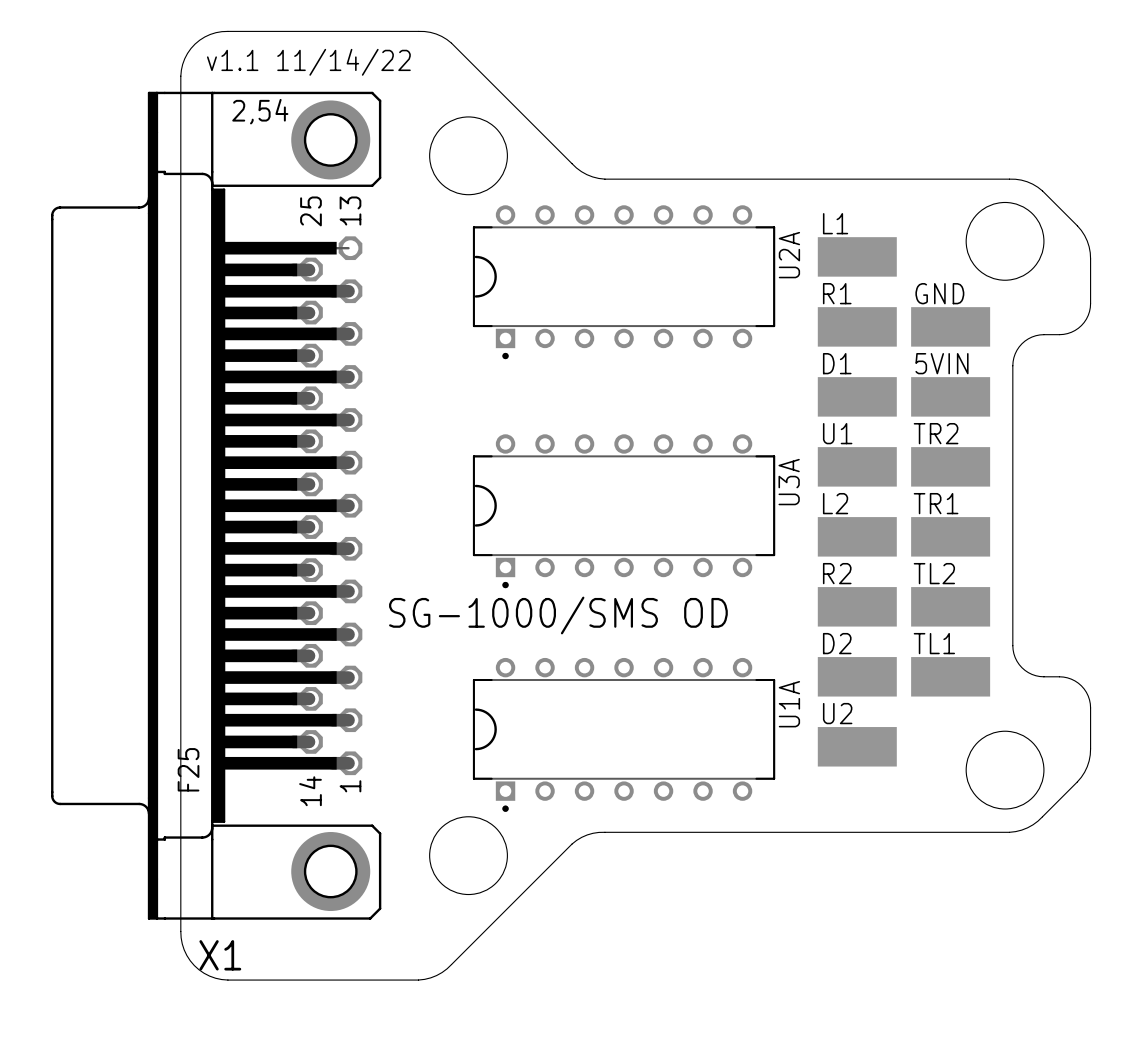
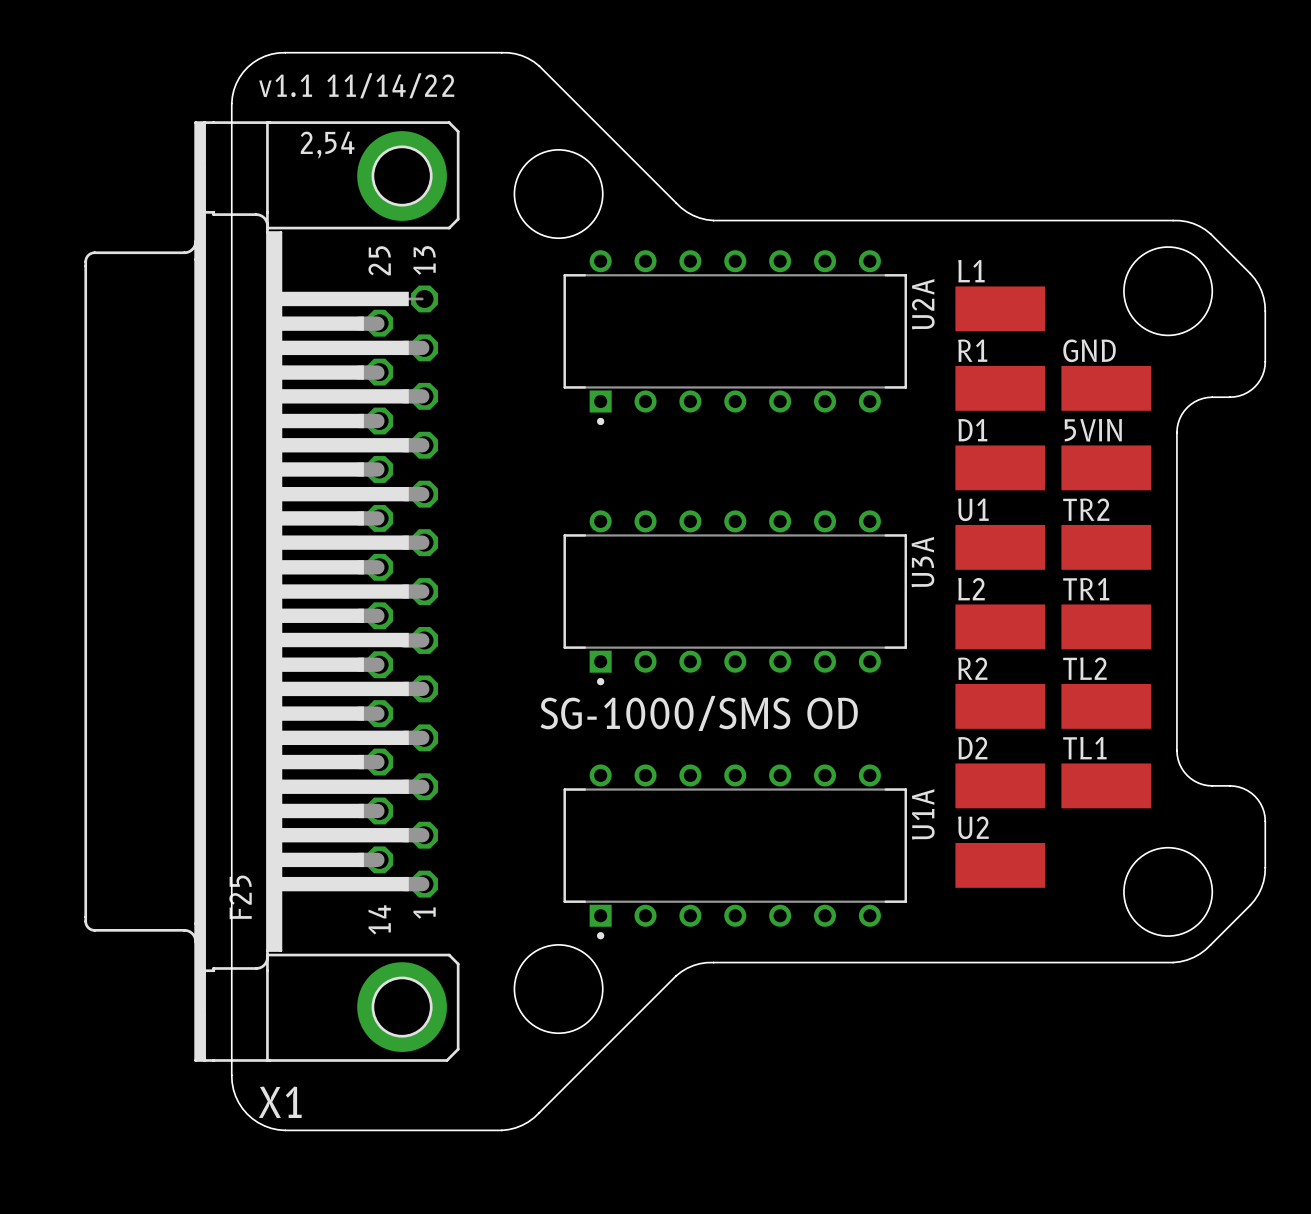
U2A footprint: [472, 205, 776, 360] -> [563, 250, 907, 426]
U3A footprint: [472, 434, 776, 589] -> [563, 510, 907, 686]
U1A footprint: [472, 657, 776, 812] -> [563, 764, 907, 940]

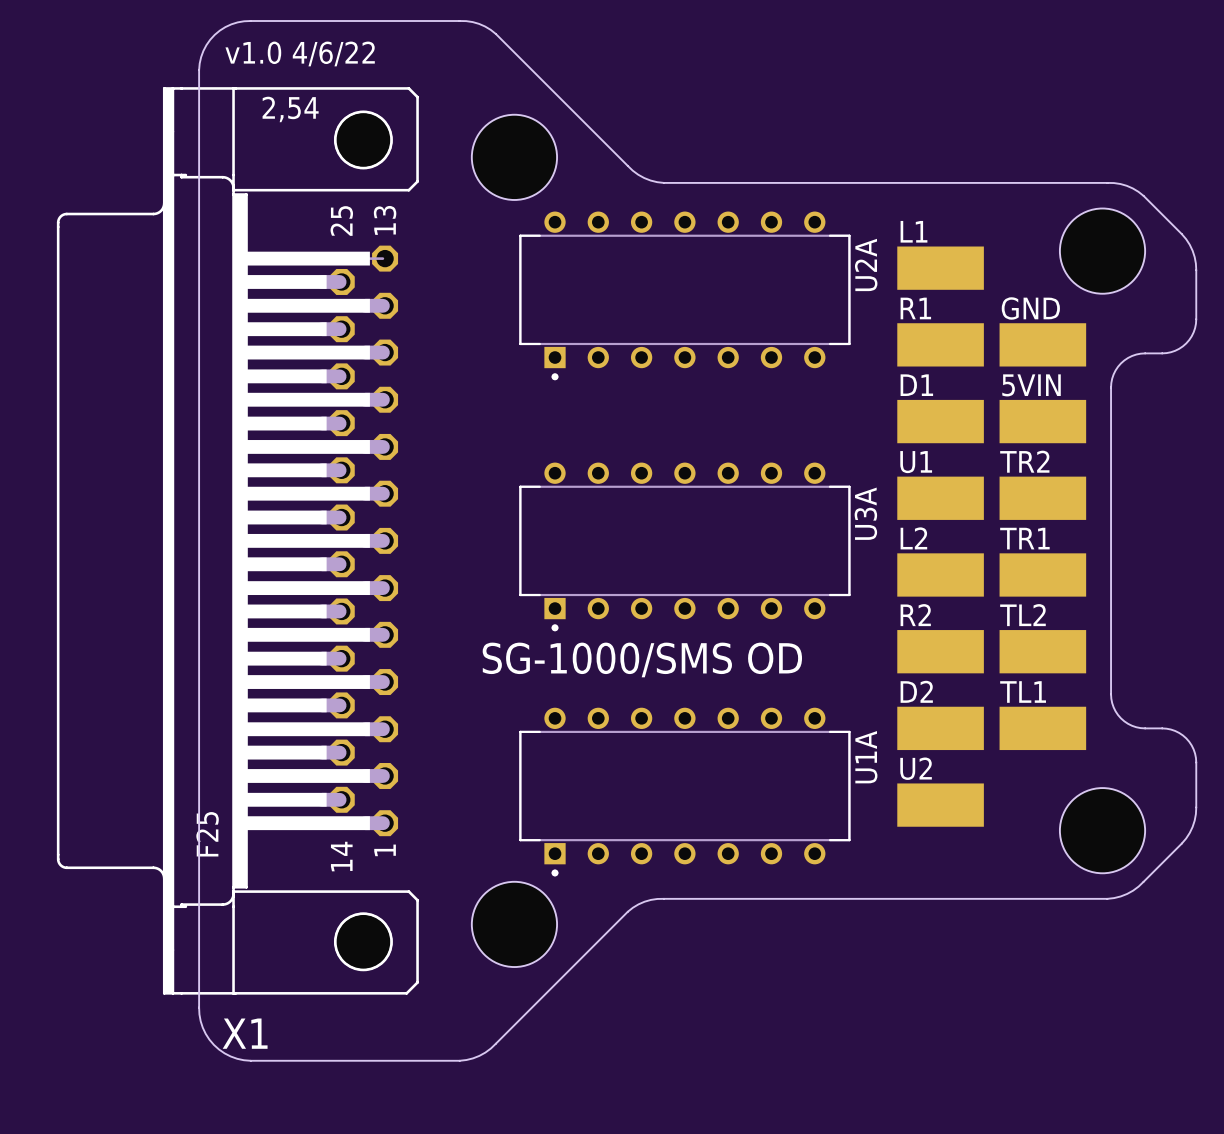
text: v1.1 11/14/22 (356, 85) -> v1.0 4/6/22 (300, 53)
X1 footprint: [84, 121, 460, 1062] -> [56, 87, 419, 995]

